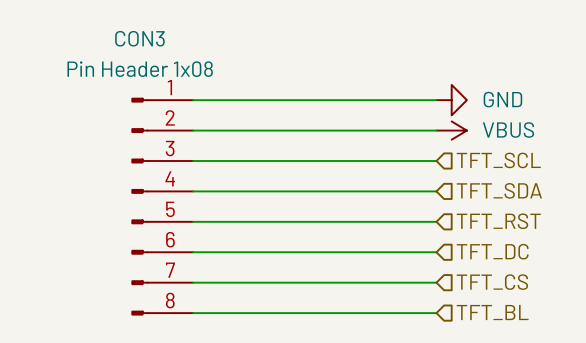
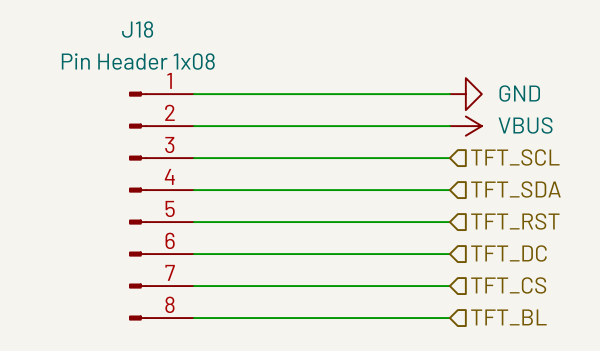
CON3 name: CON3 (139, 38) -> J18 (137, 29)

